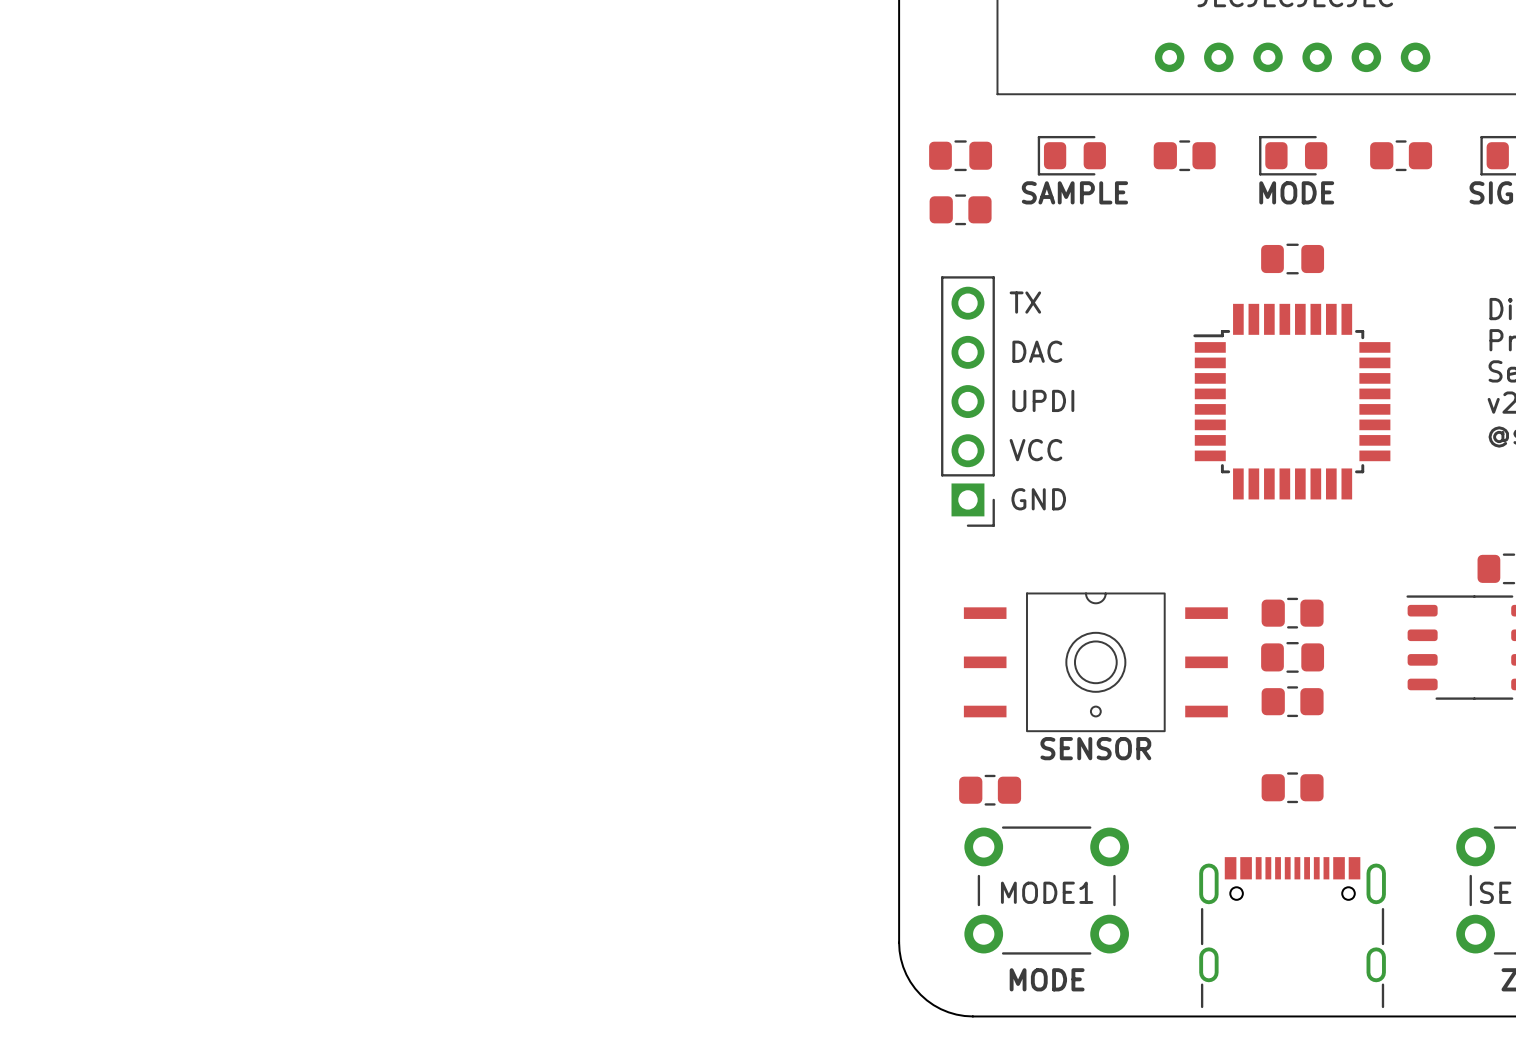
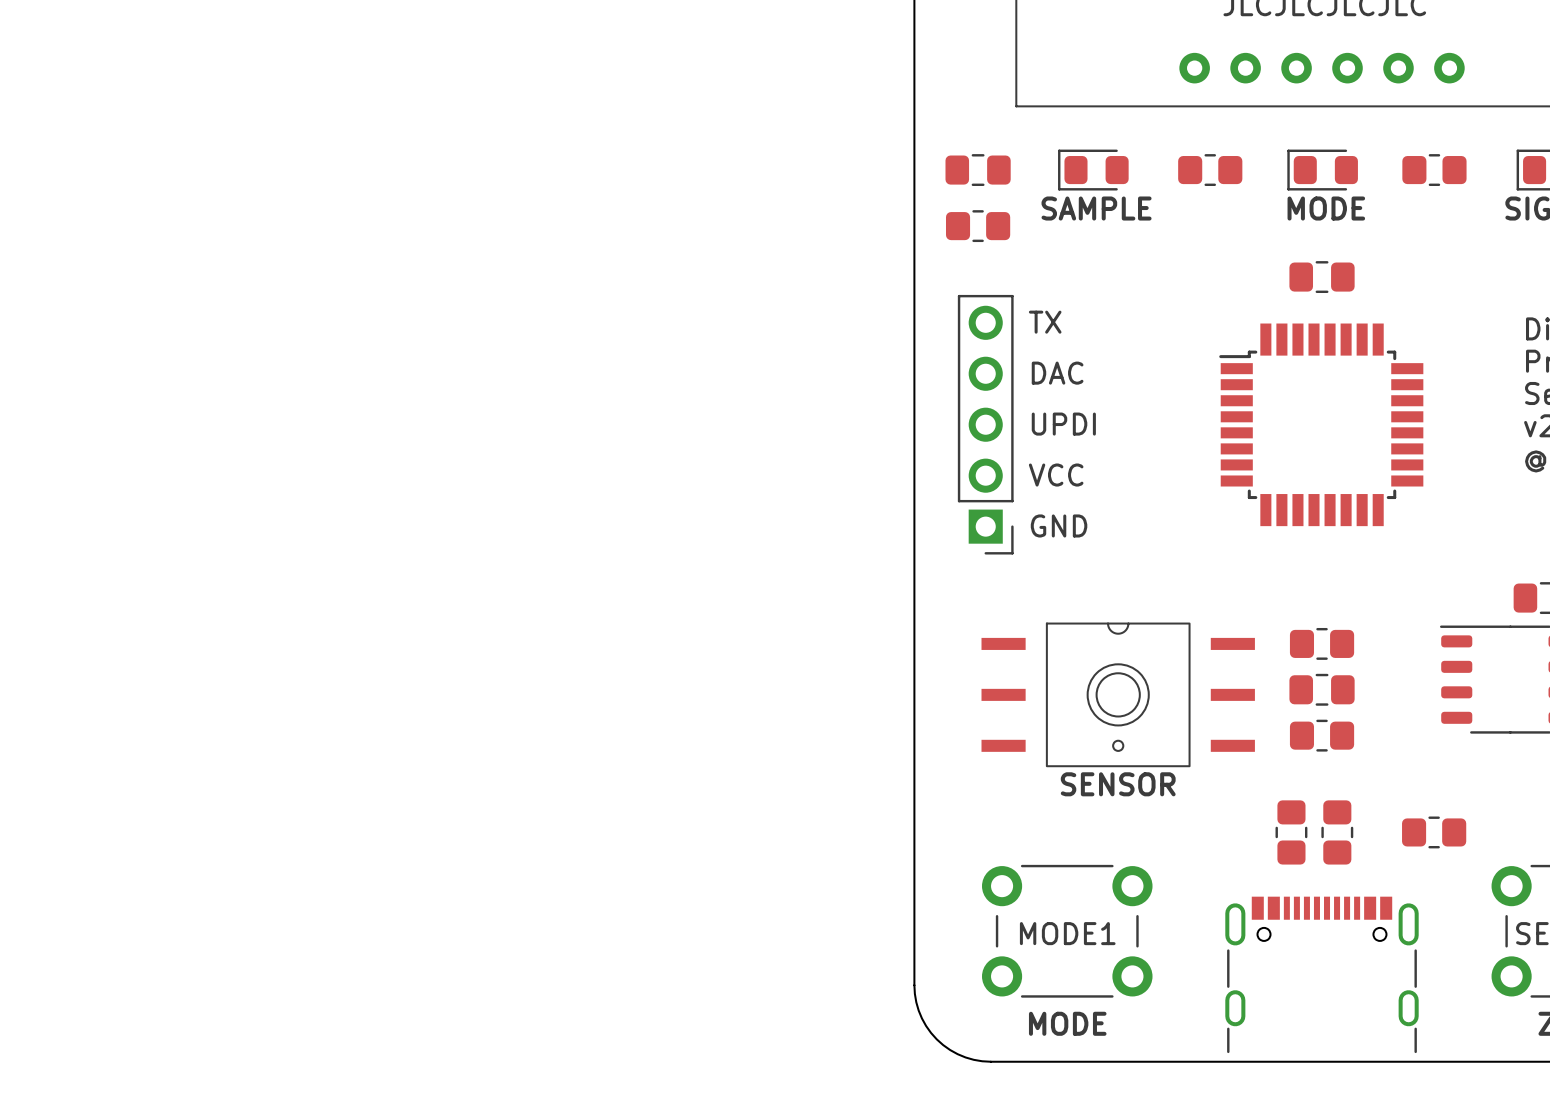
part: (1292, 787) -> none
part: (990, 790) -> none
part: none -> (1291, 832)
part: none -> (1337, 832)
part: none -> (1434, 832)

